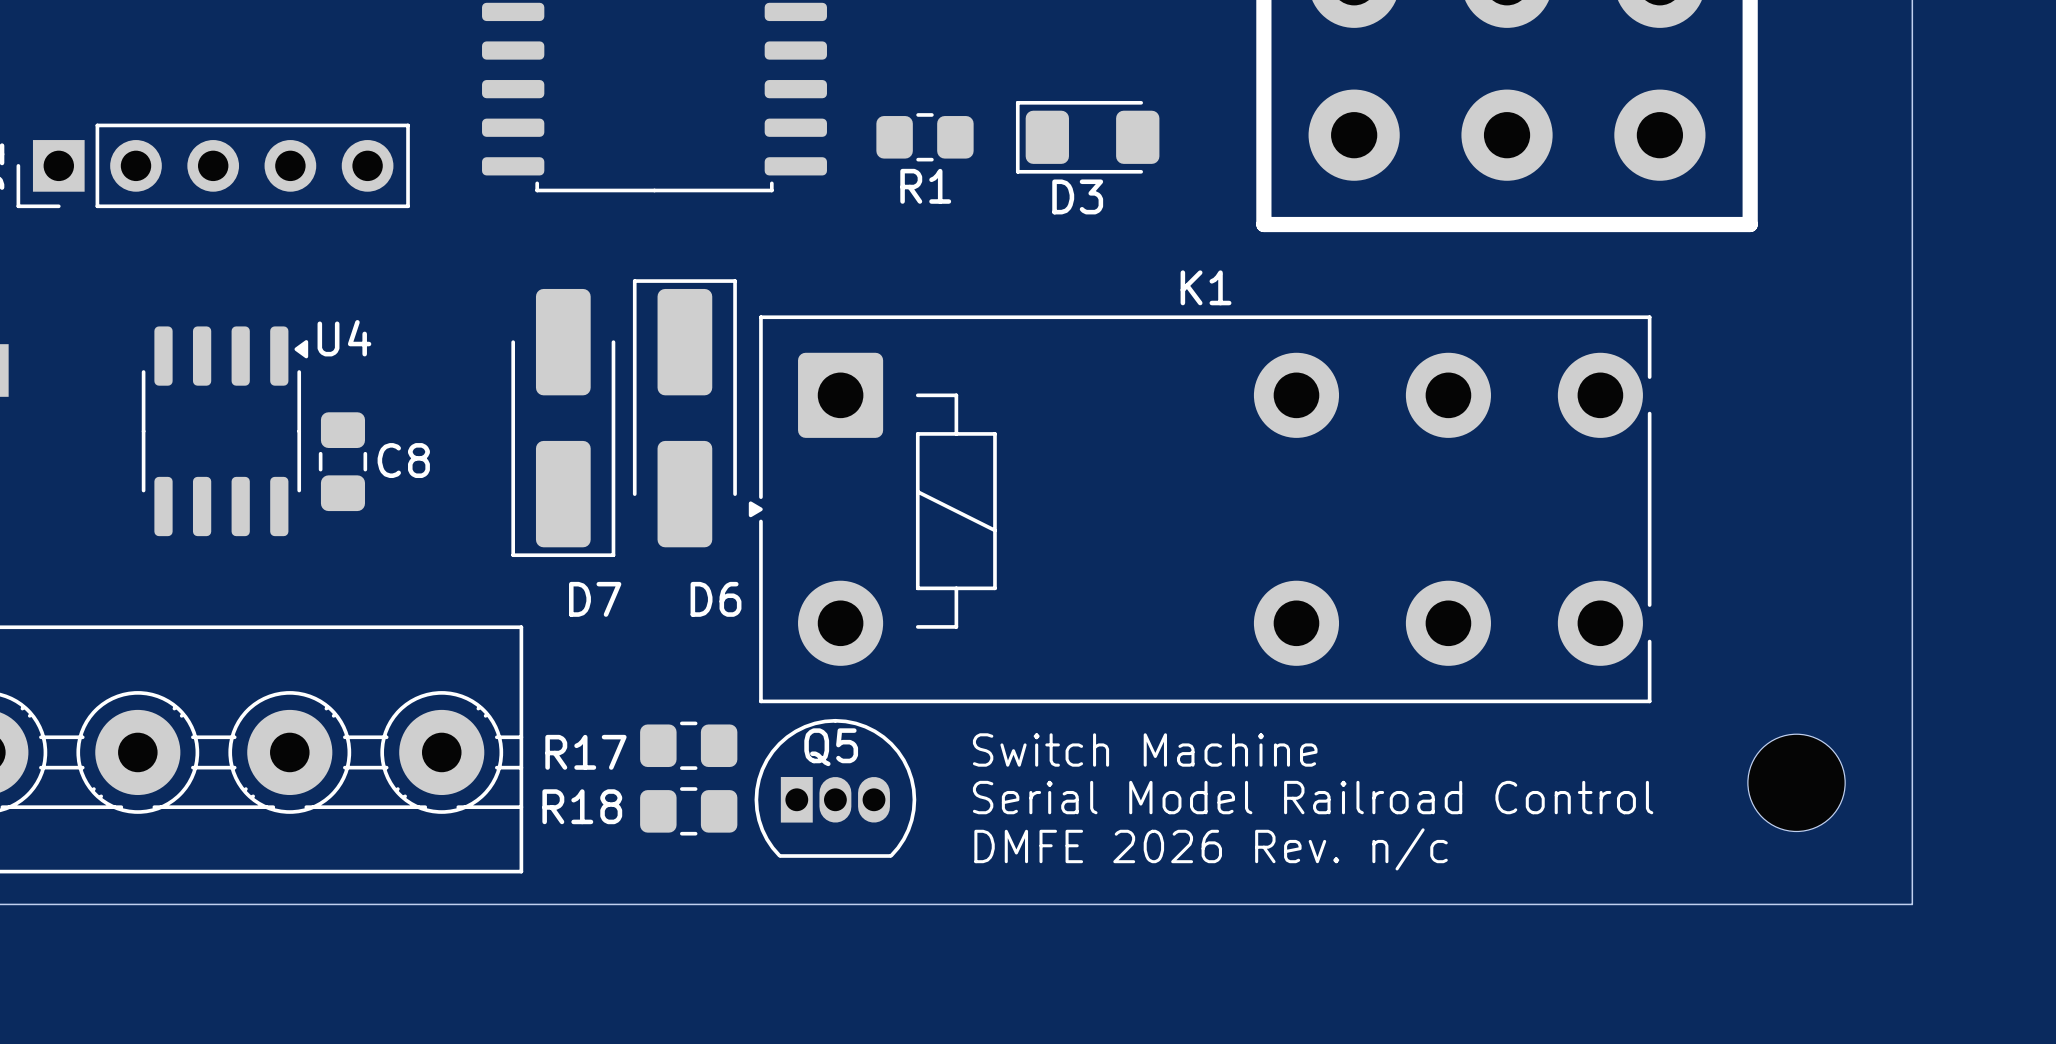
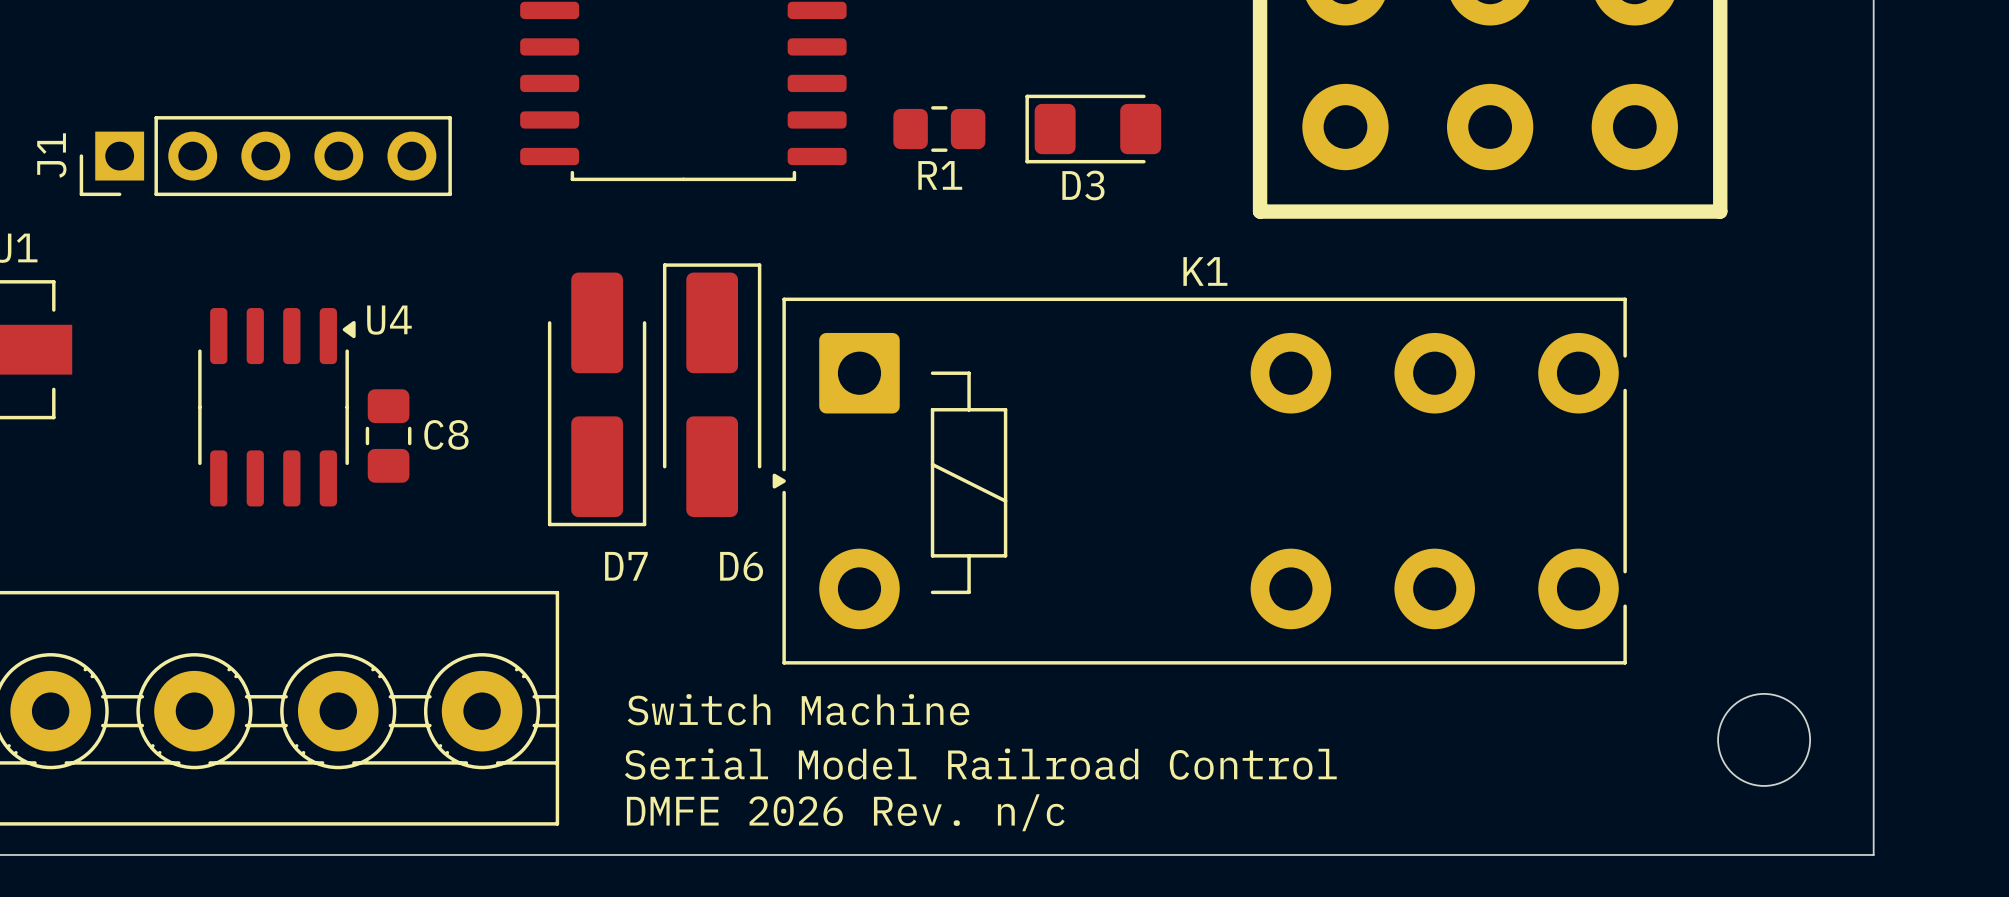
R17: (688, 745) -> none
text position: Switch Machine (1145, 749) -> Switch Machine (798, 709)
Q5: (835, 788) -> none
text position: Serial Model Railroad Control (1313, 797) -> Serial Model Railroad Control (980, 764)
R18: (688, 811) -> none
text position: DMFE 2026 Rev. n/c (1211, 849) -> DMFE 2026 Rev. n/c (845, 812)

